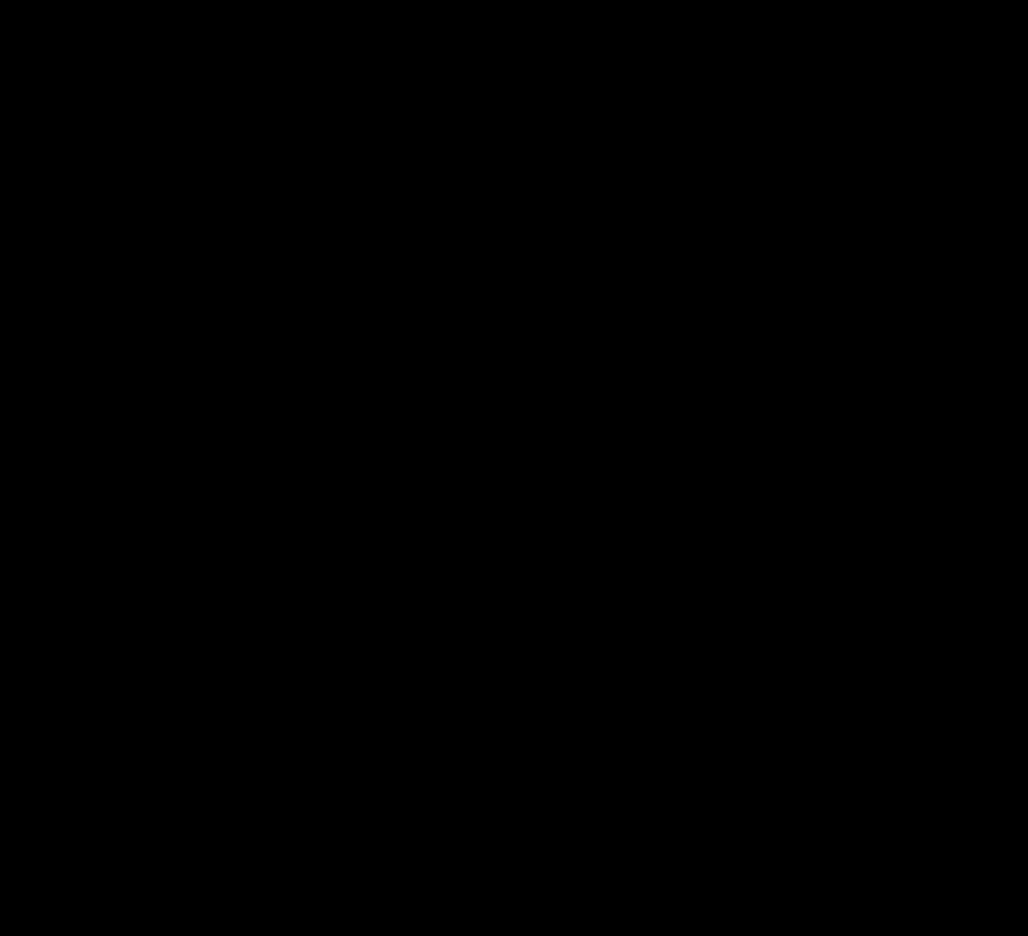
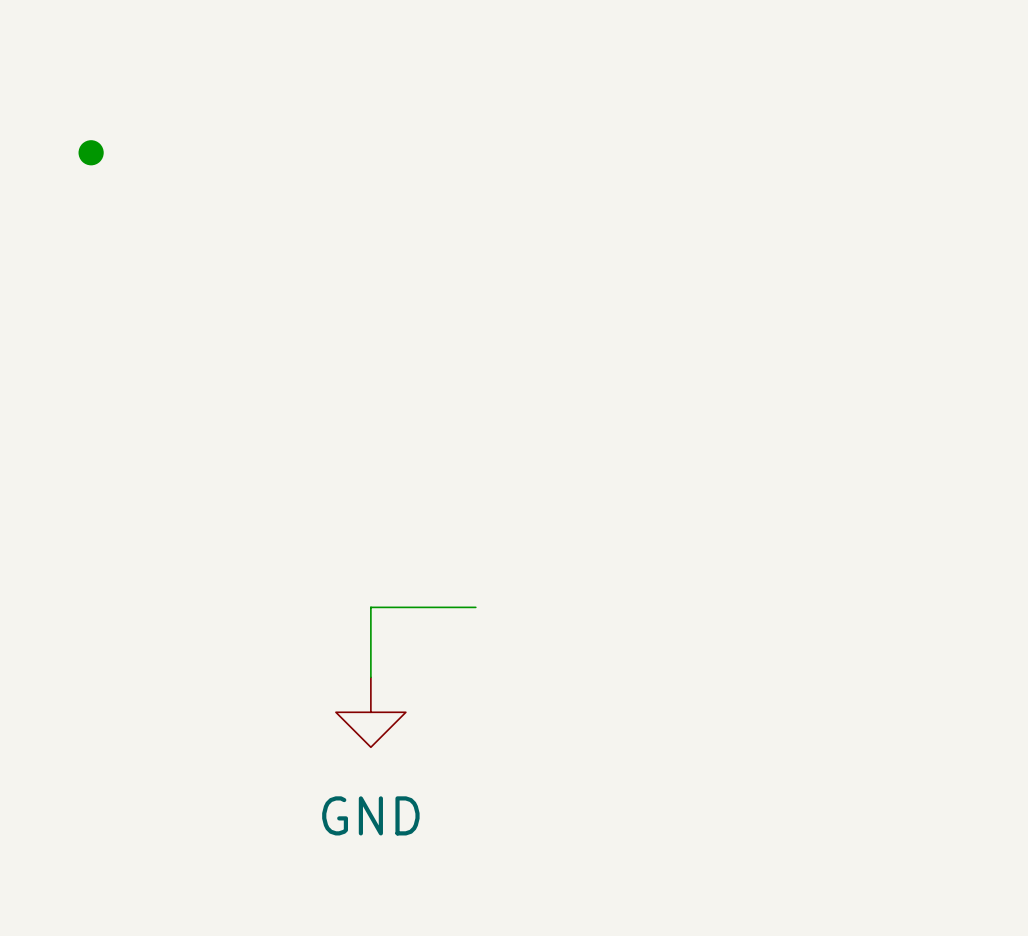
junction: none -> (91, 152)
wire: none -> (475, 607) (370, 607) (370, 677)
power symbol: none -> GND (370, 712)

